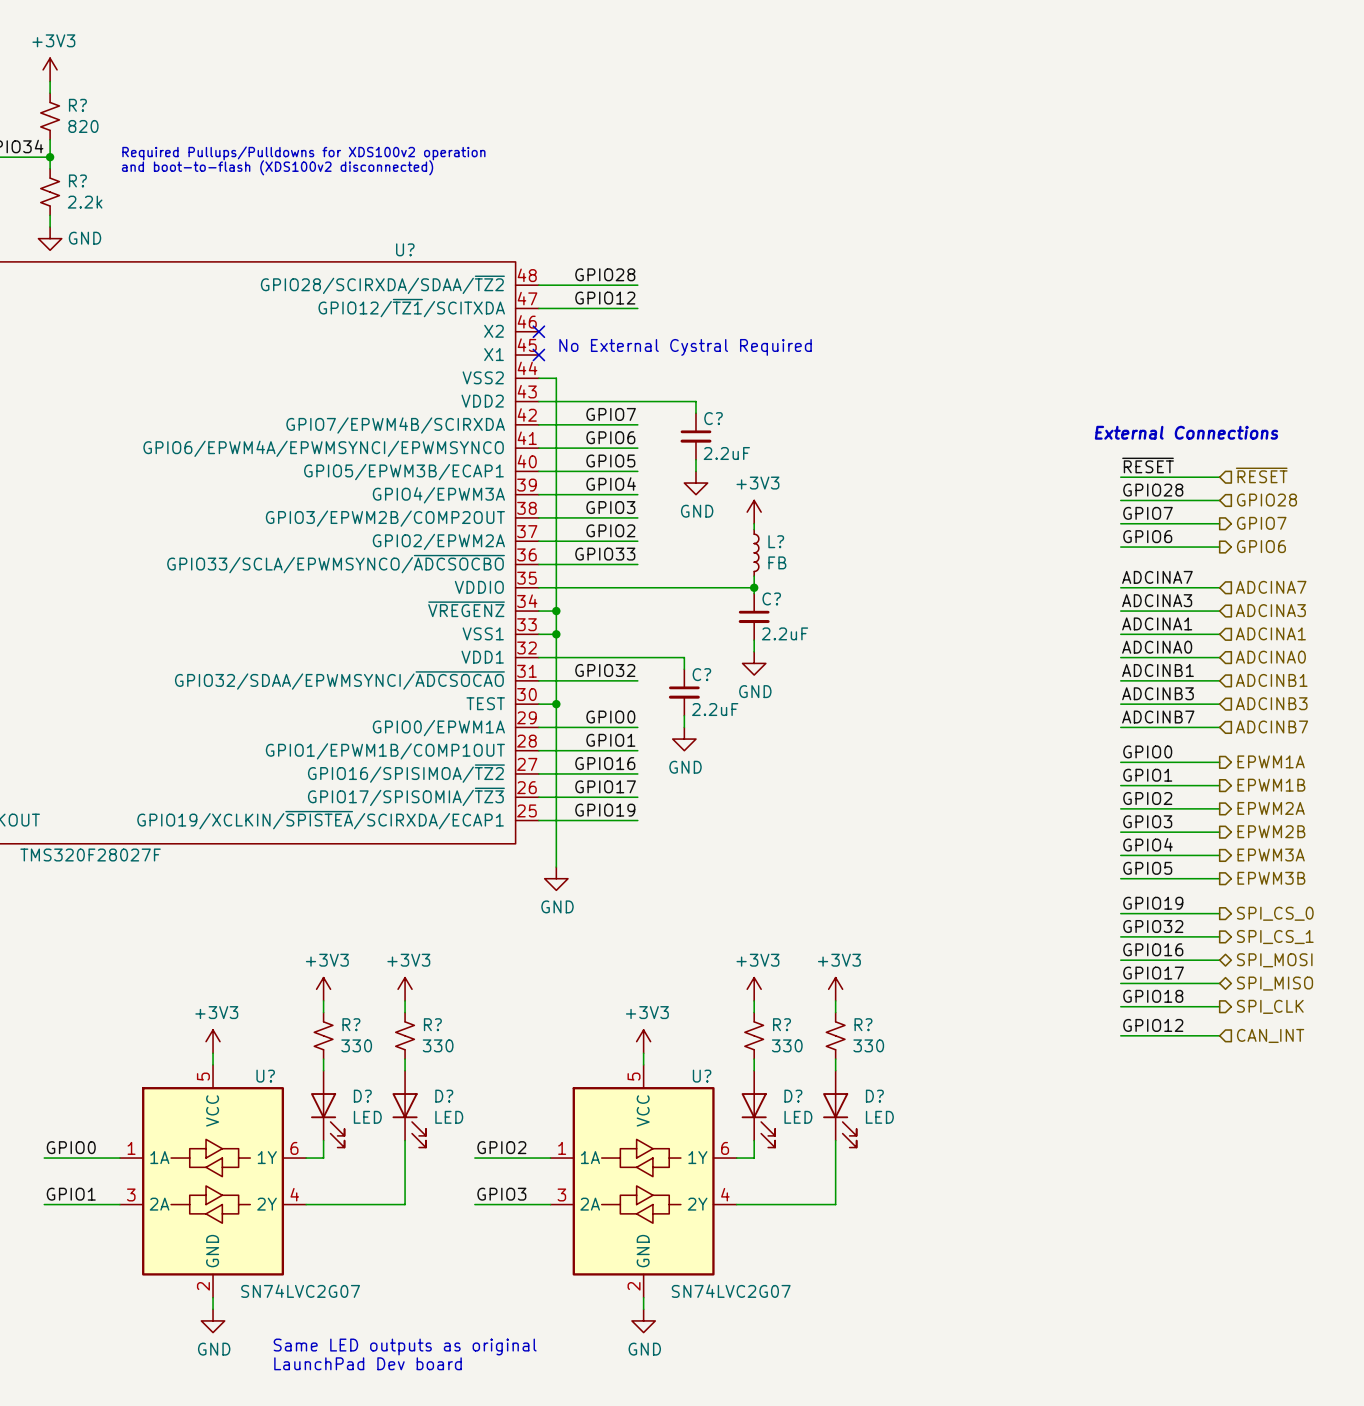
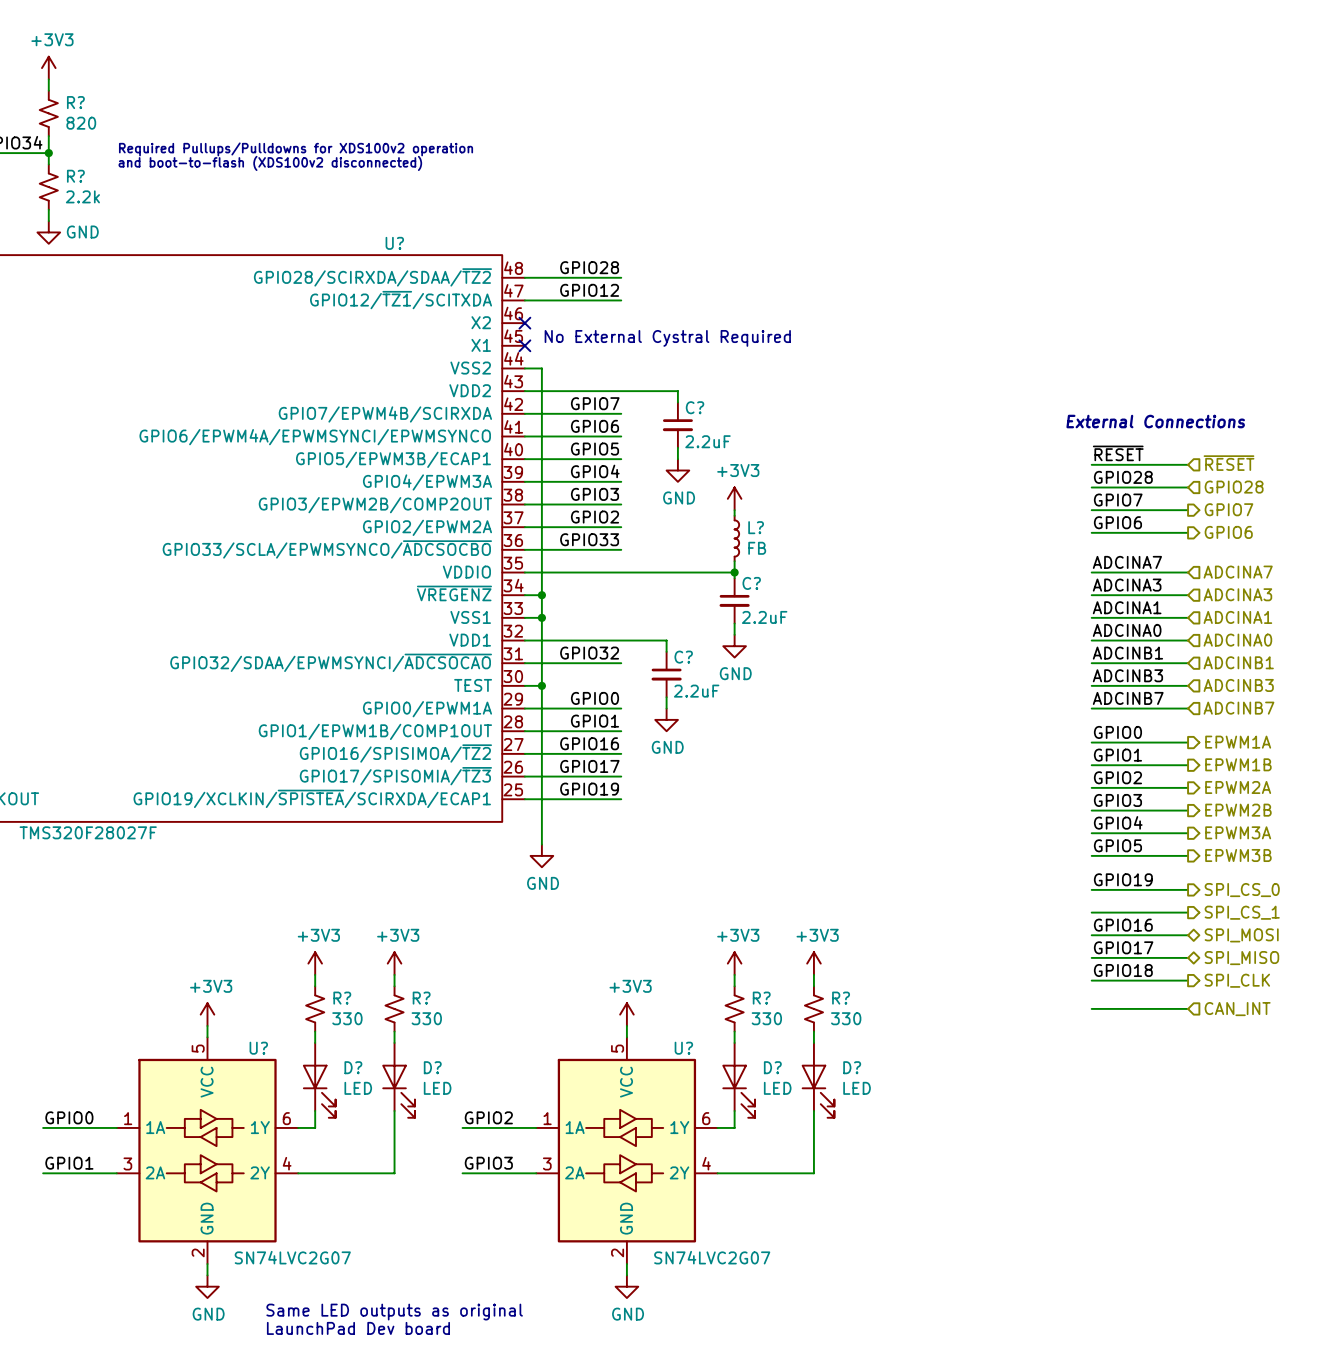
label: GPIO32 (1153, 926) -> none
label: GPIO12 (1153, 1025) -> none

